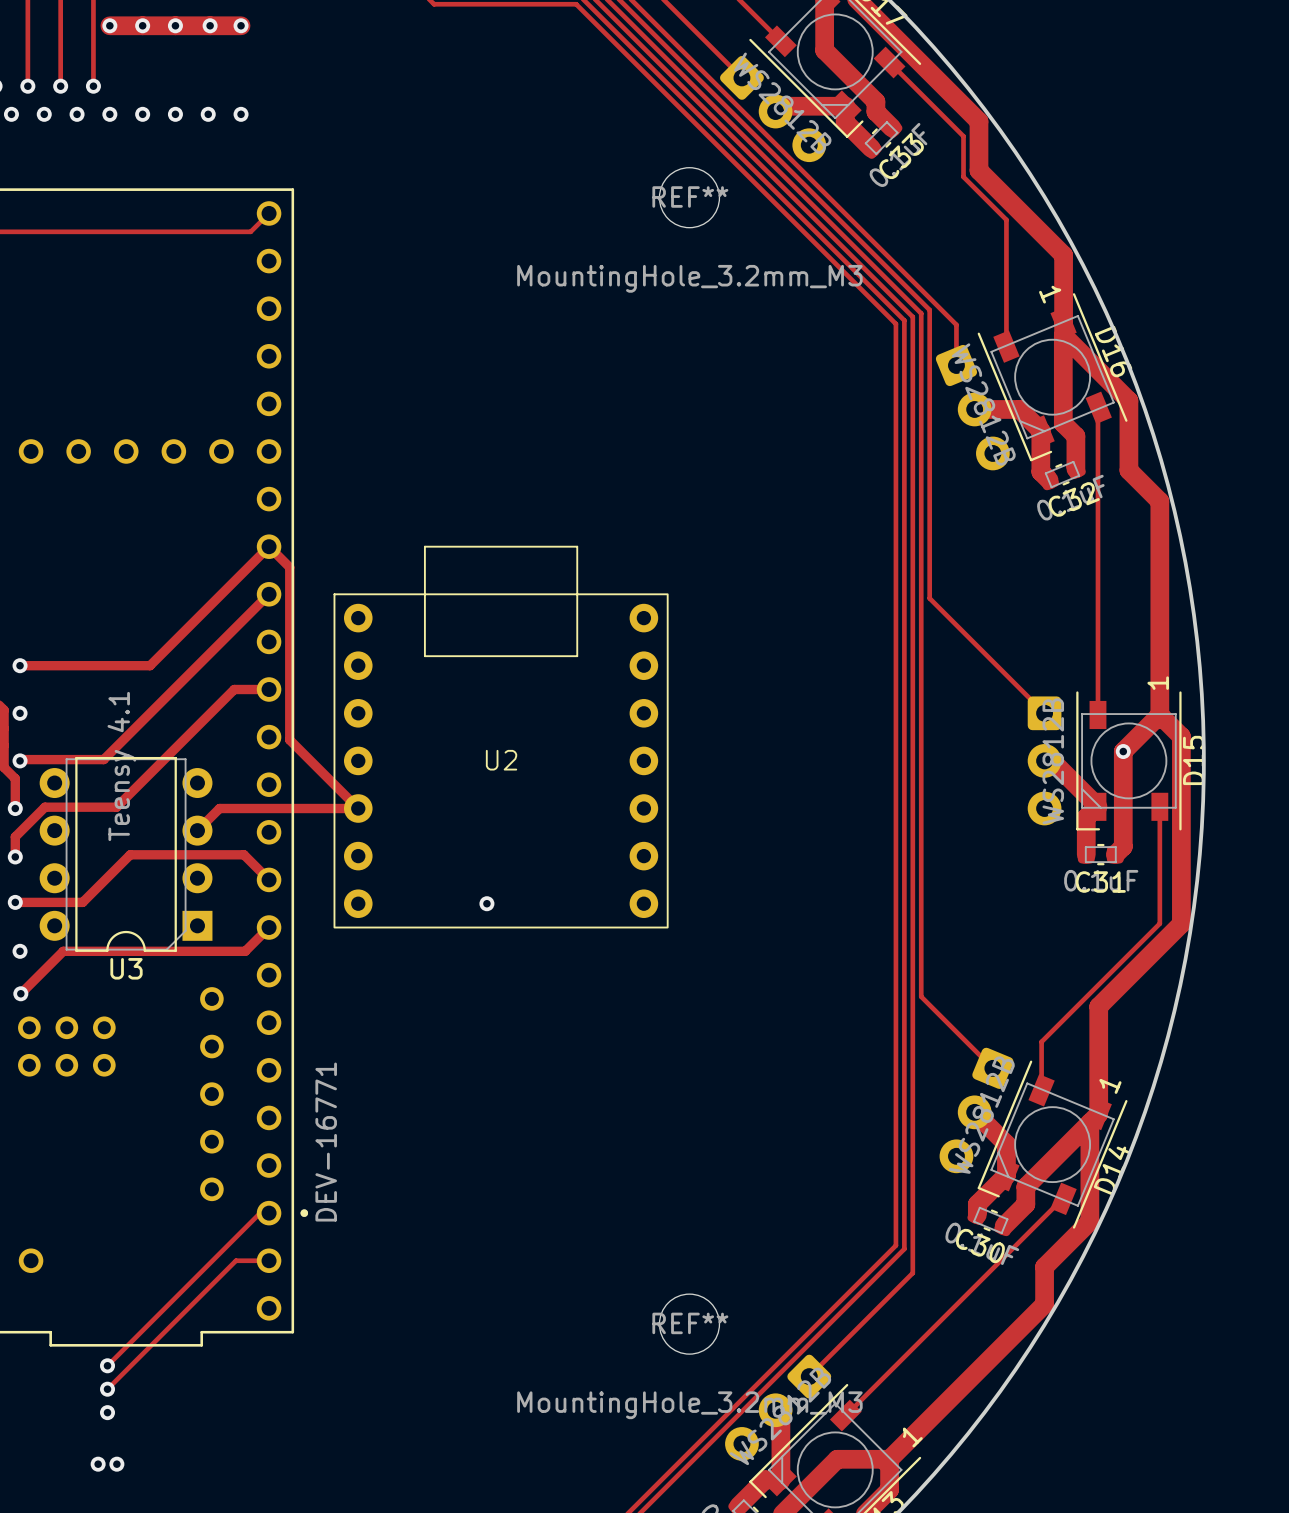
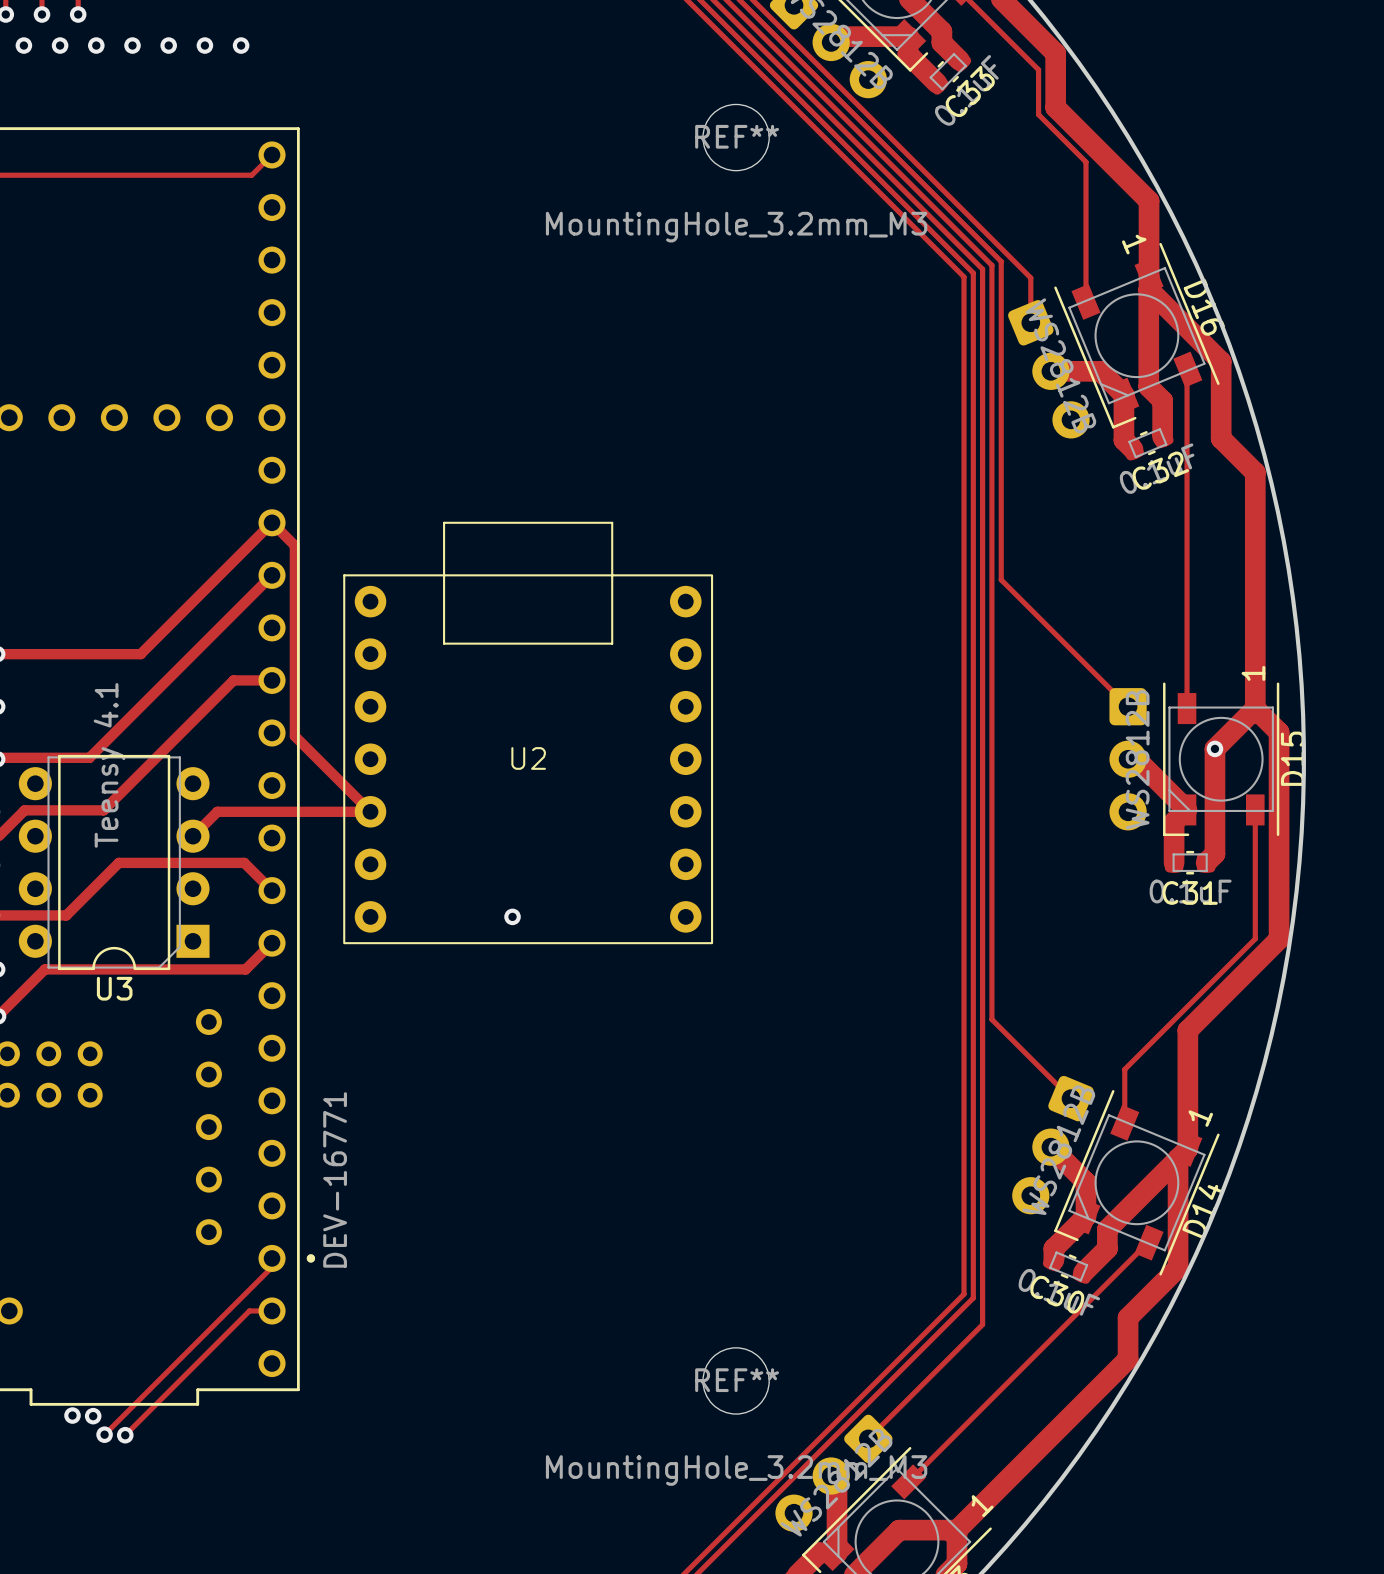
track: (269, 1213) (260, 1213) (107, 1365) -> none
track: none -> (272, 1267) (104, 1434)
track: (248, 1260) (235, 1260) (107, 1389) -> (249, 1310) (125, 1435)
via: none -> (72, 1415)
via: none -> (93, 1416)
via: (107, 1365) -> none
via: none -> (104, 1434)
via: none -> (125, 1435)
via: (107, 1389) -> none
via: (107, 1412) -> none
via: (98, 1464) -> none
via: (116, 1464) -> none

